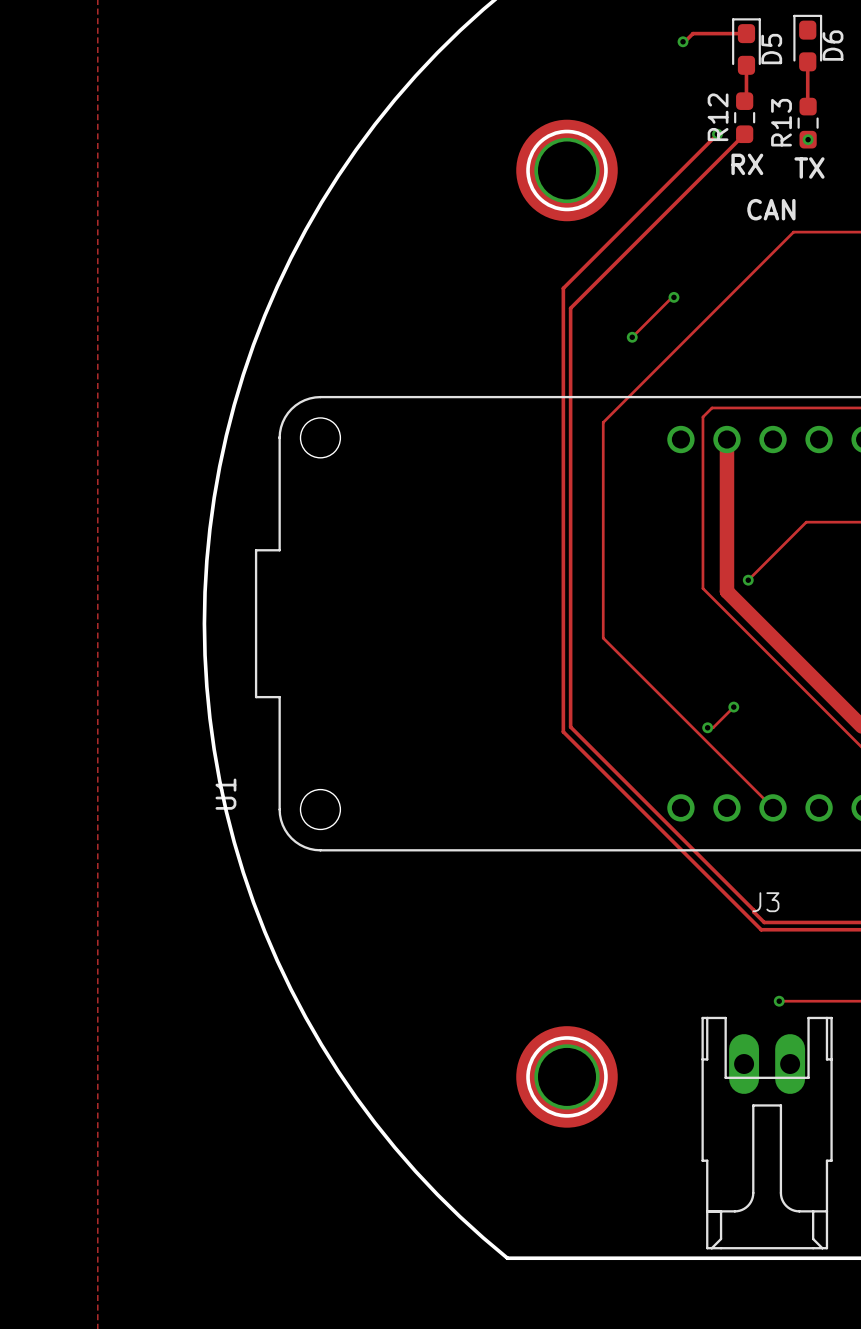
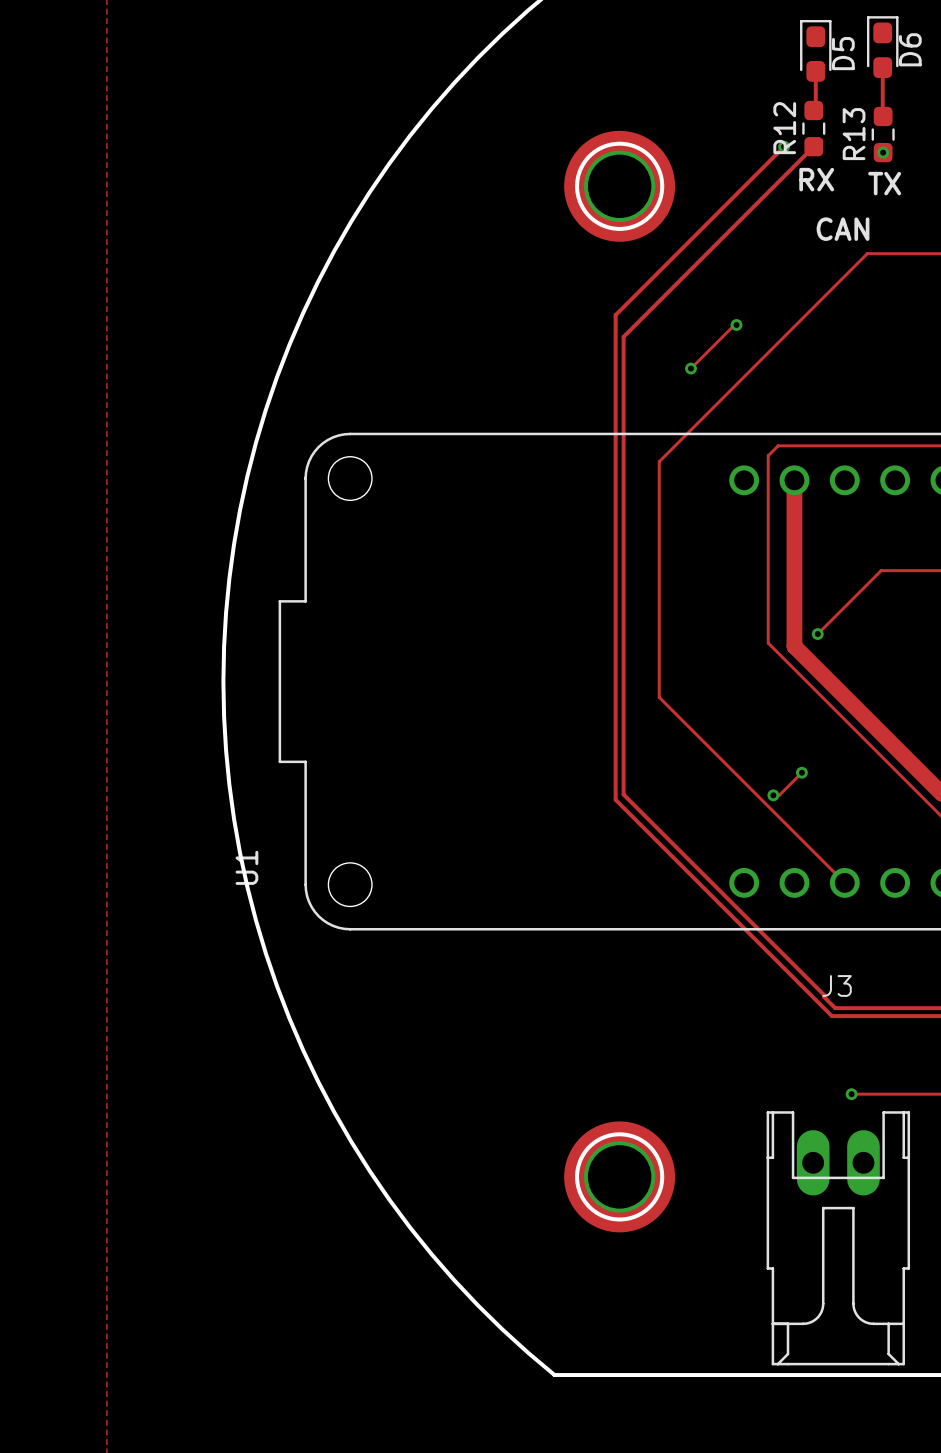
track: (746, 33) (692, 33) (683, 41) -> none
via: (683, 41) -> none

